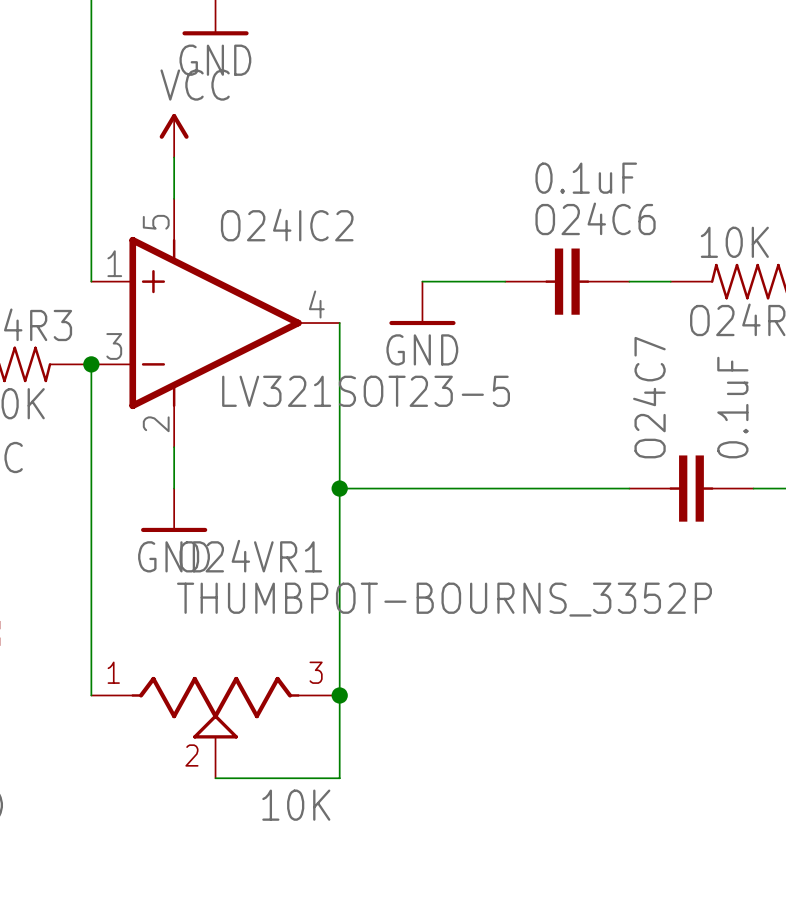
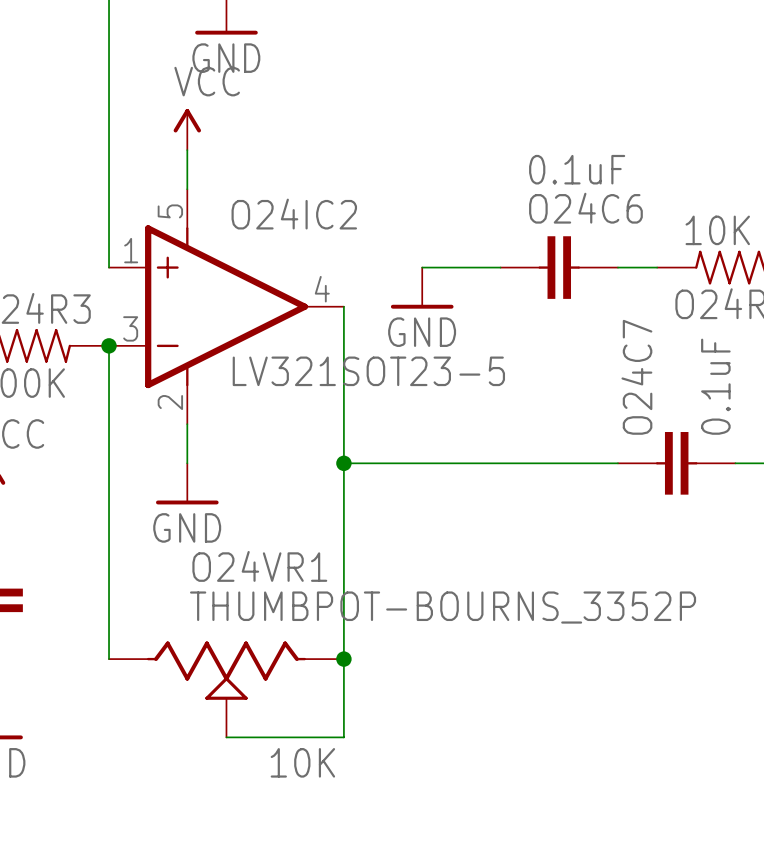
O24VR1 name position: O24VR1 (250, 556) -> O24VR1 (259, 566)
O24VR1 value position: THUMBPOT-BOURNS_3352P (444, 599) -> THUMBPOT-BOURNS_3352P (443, 607)
O24VR1 text: 1 (113, 672) -> none
O24VR1 text: 3 (316, 672) -> none
O24VR1 text: 2 (191, 755) -> none

